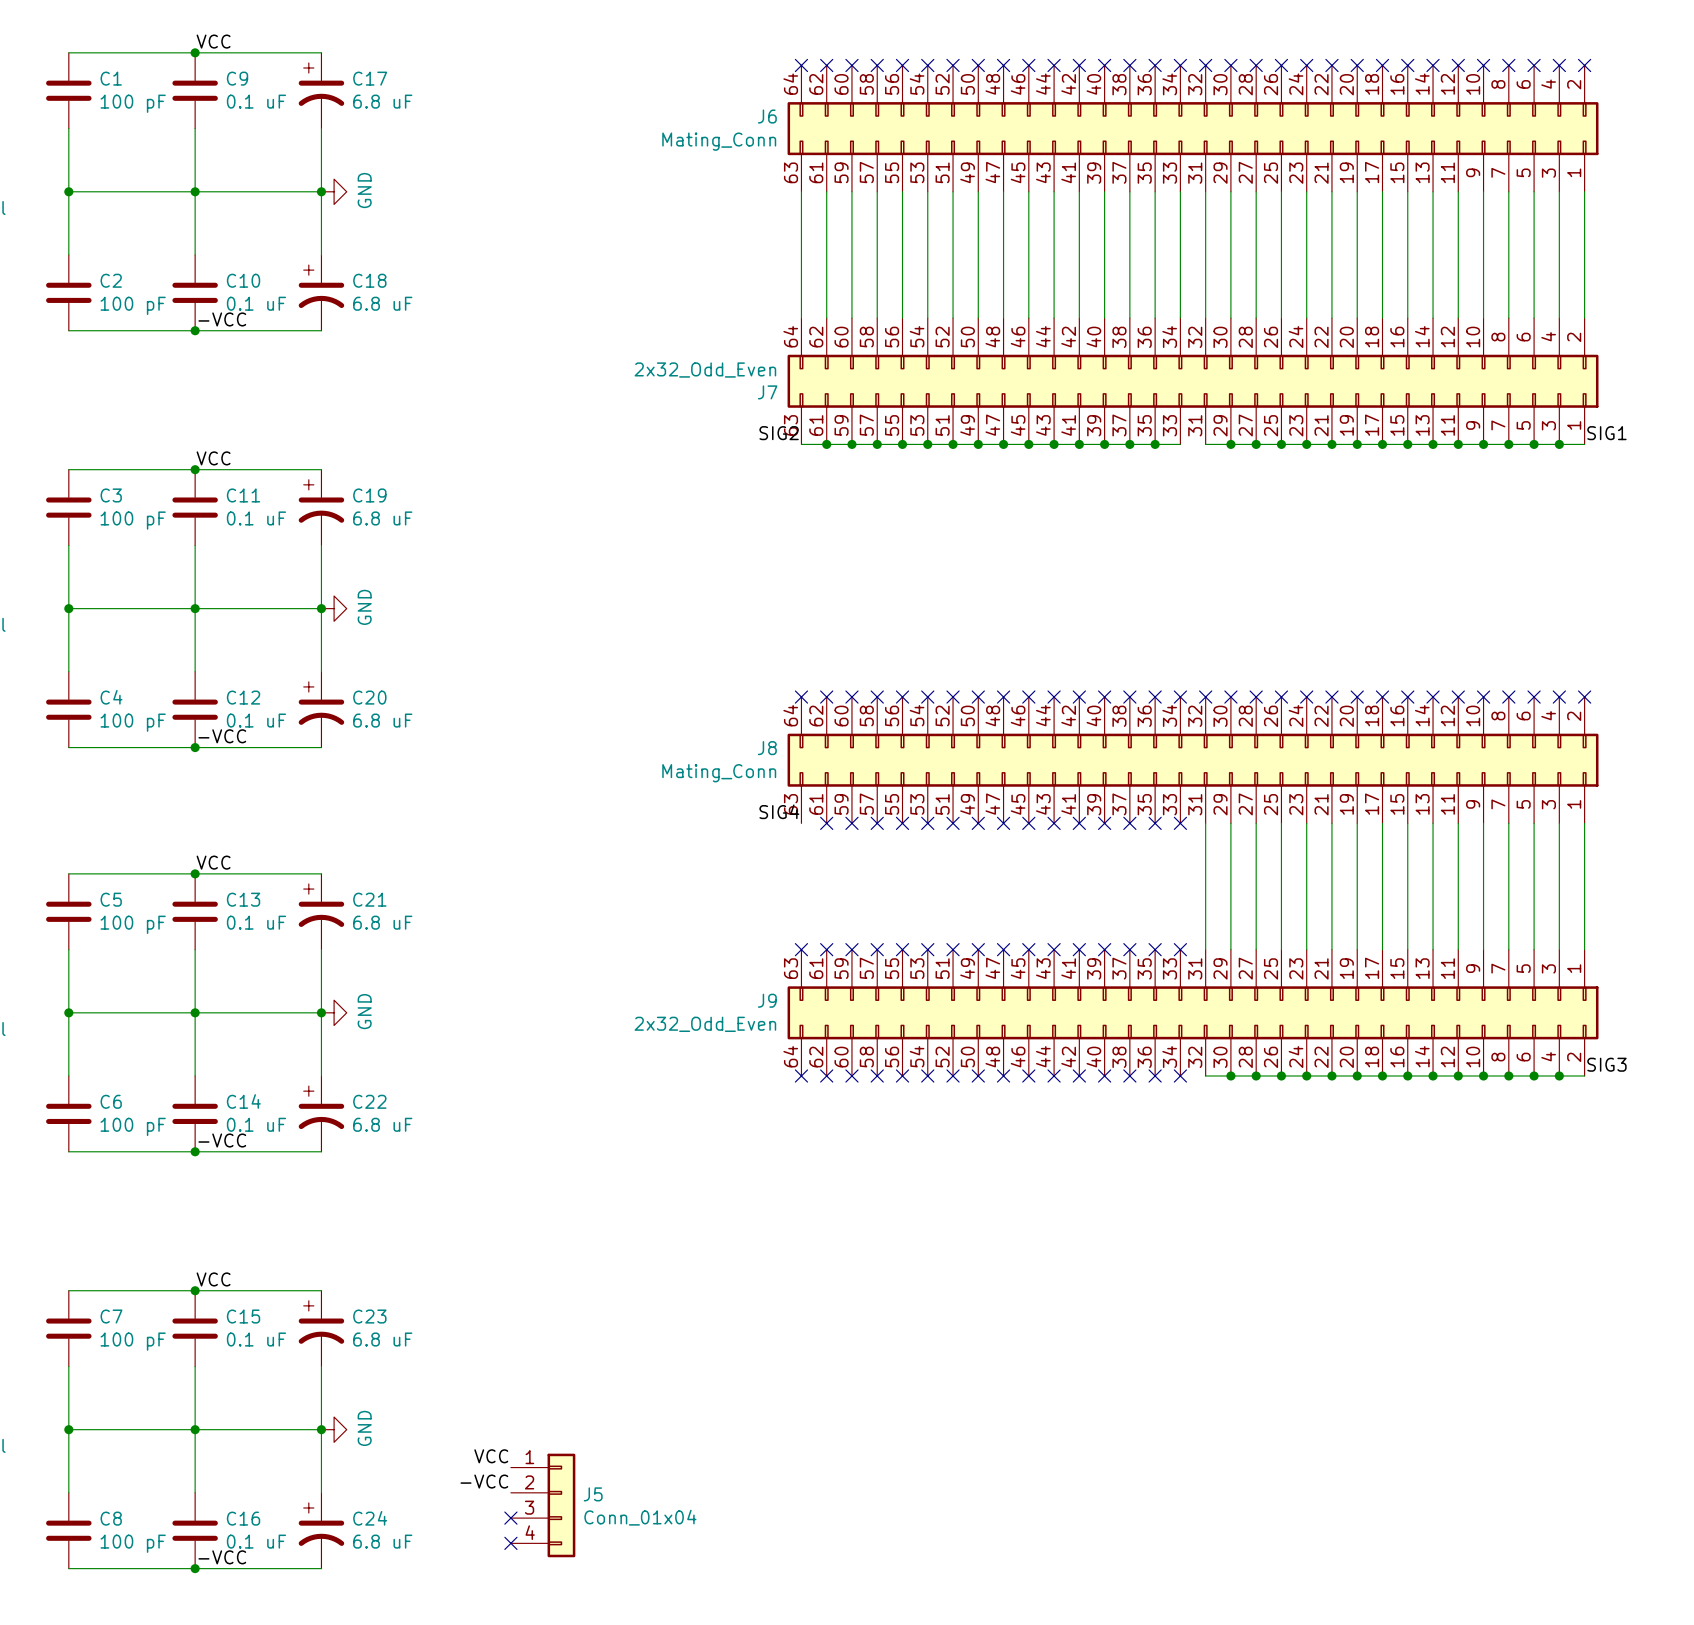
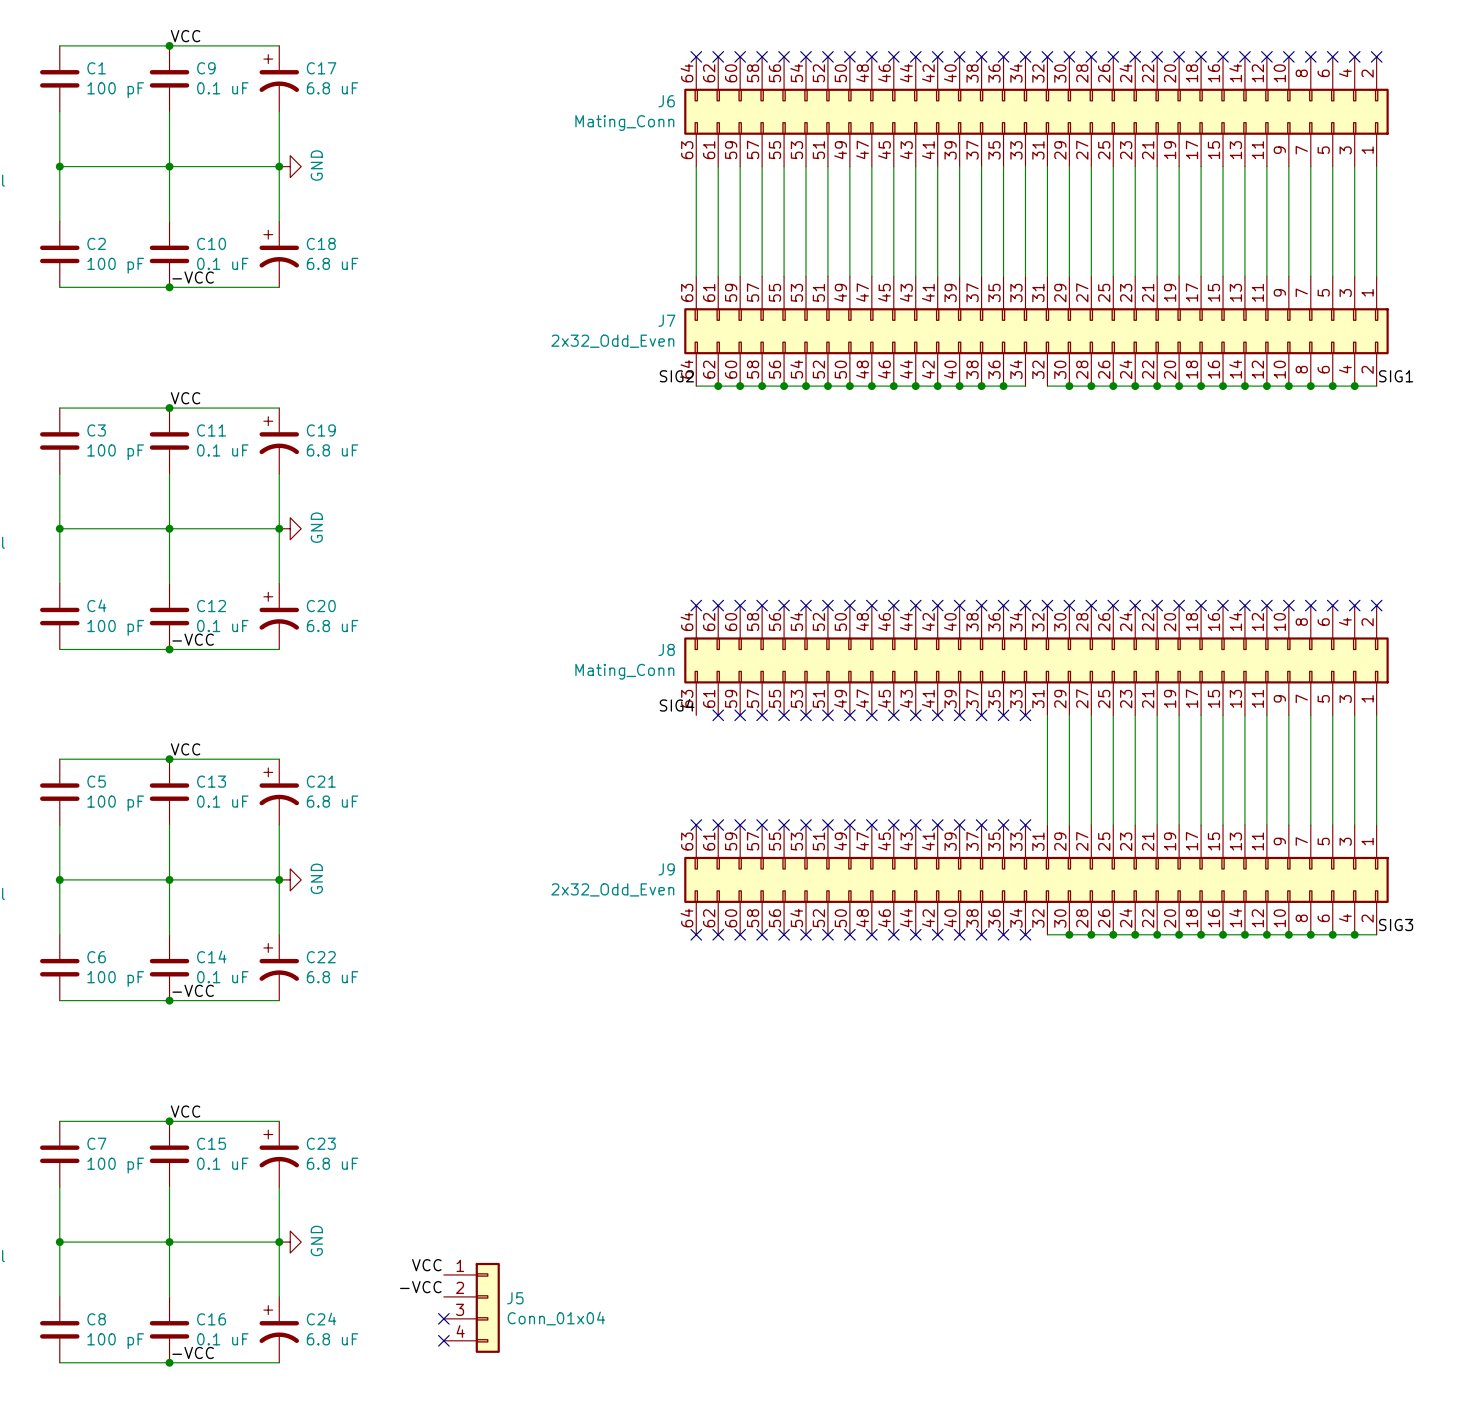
J7 flip: as is (1193, 381) -> up-down (1036, 331)

